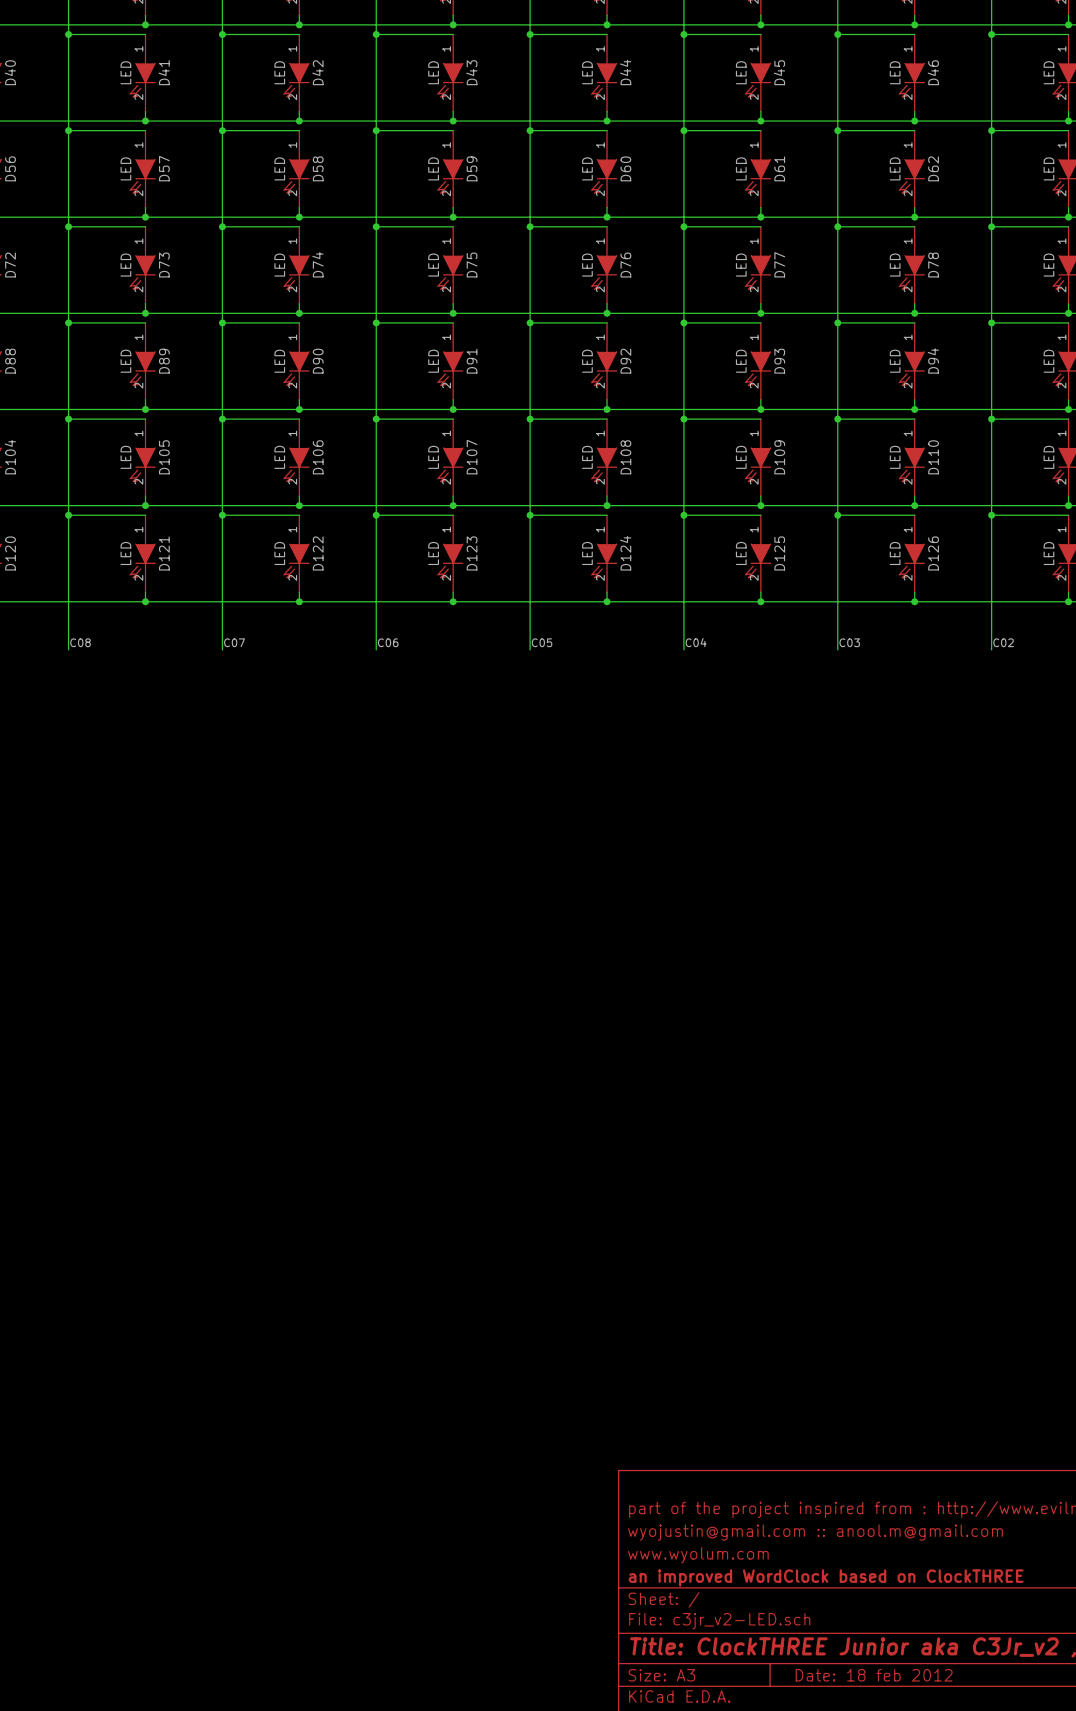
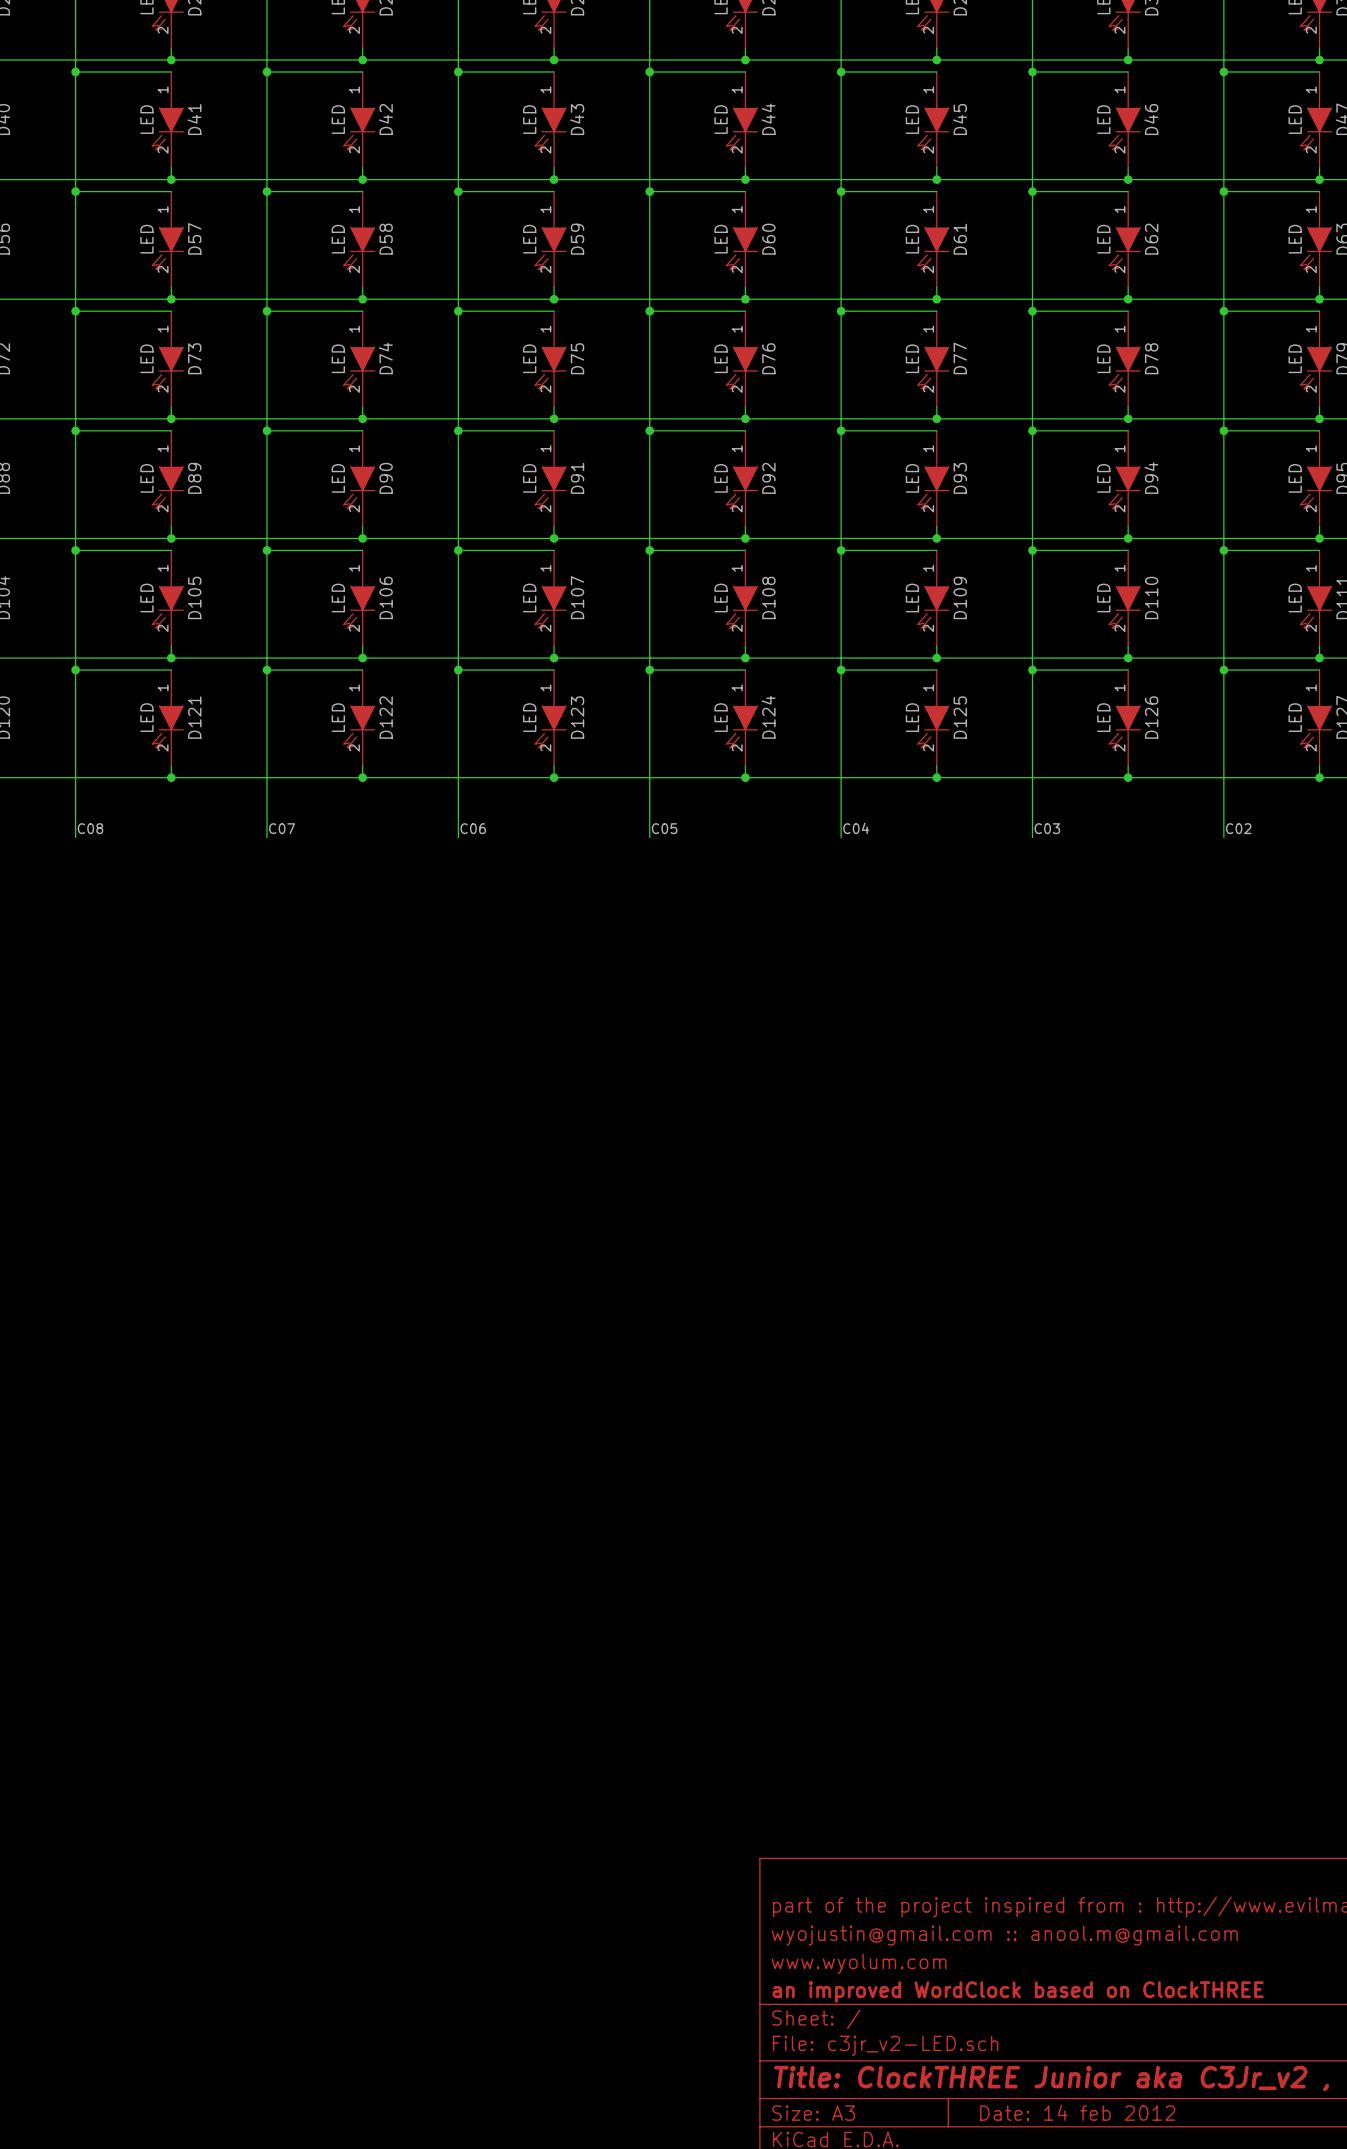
title block: Date: 18 feb 2012 (874, 1675) -> Date: 14 feb 2012 (1077, 2112)

